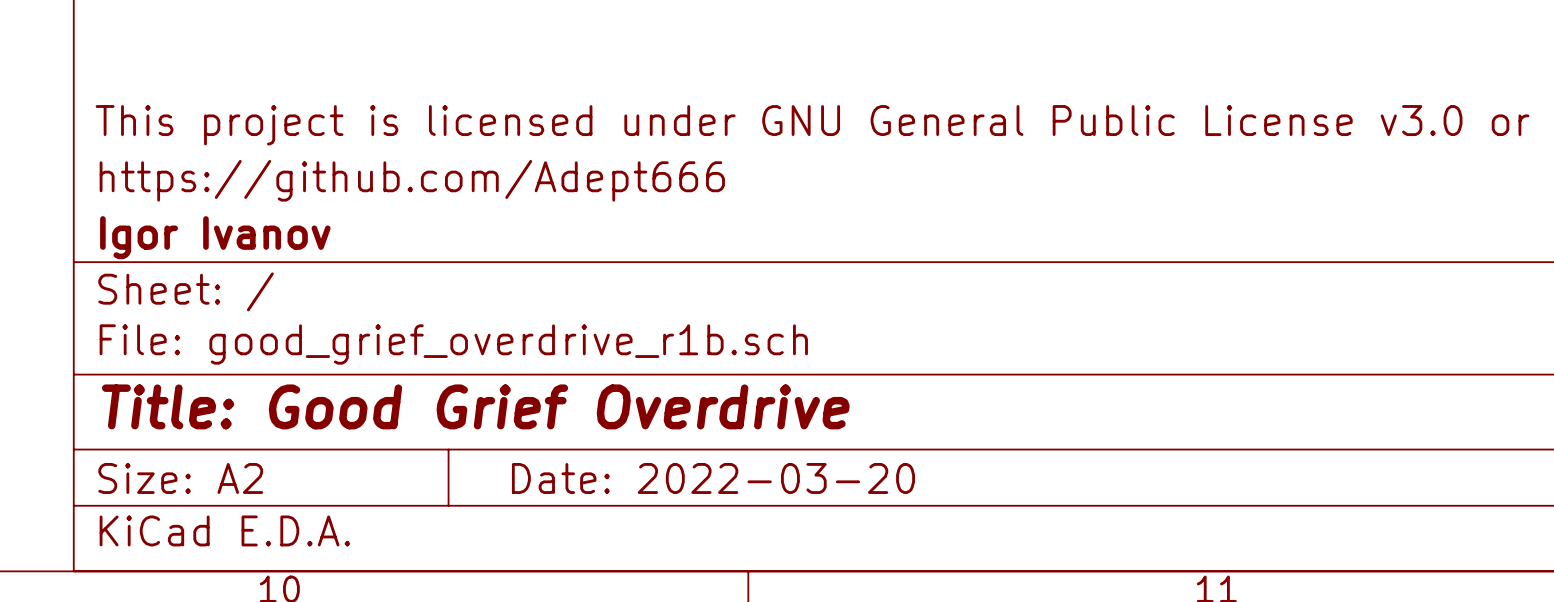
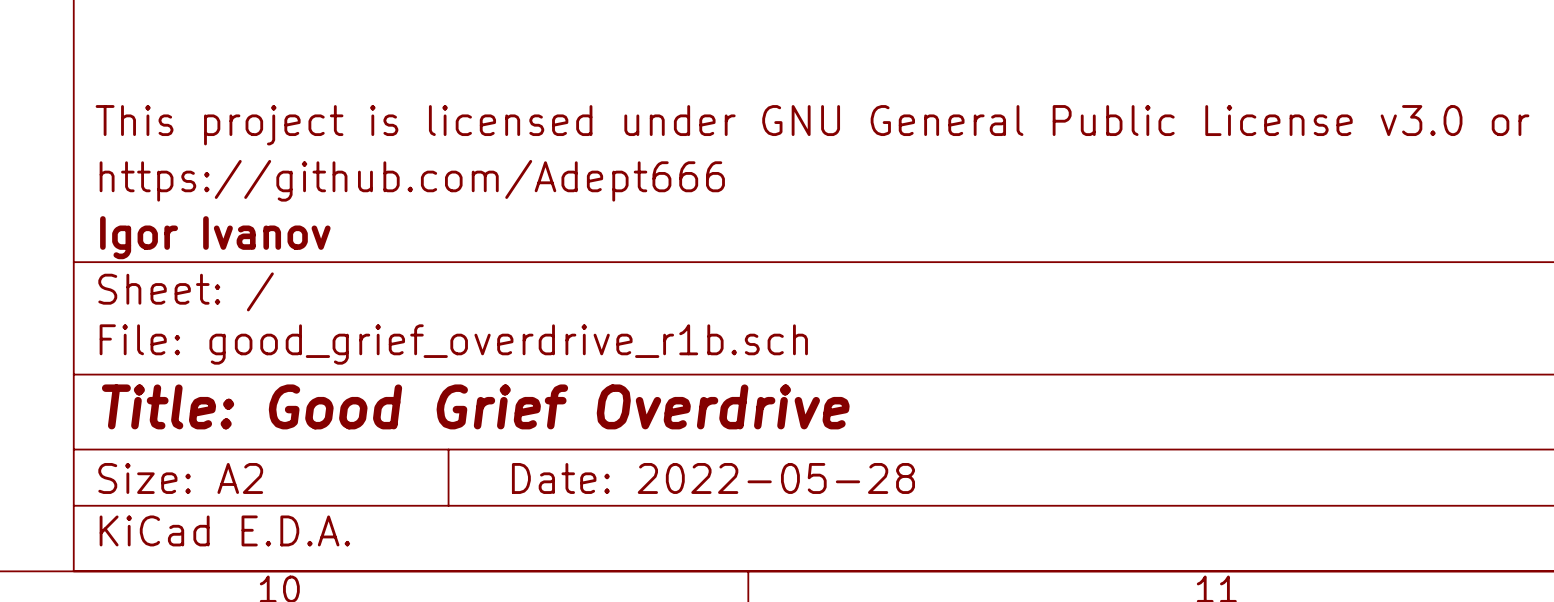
title block: Date: 2022-03-20 (713, 478) -> Date: 2022-05-28 (713, 478)

